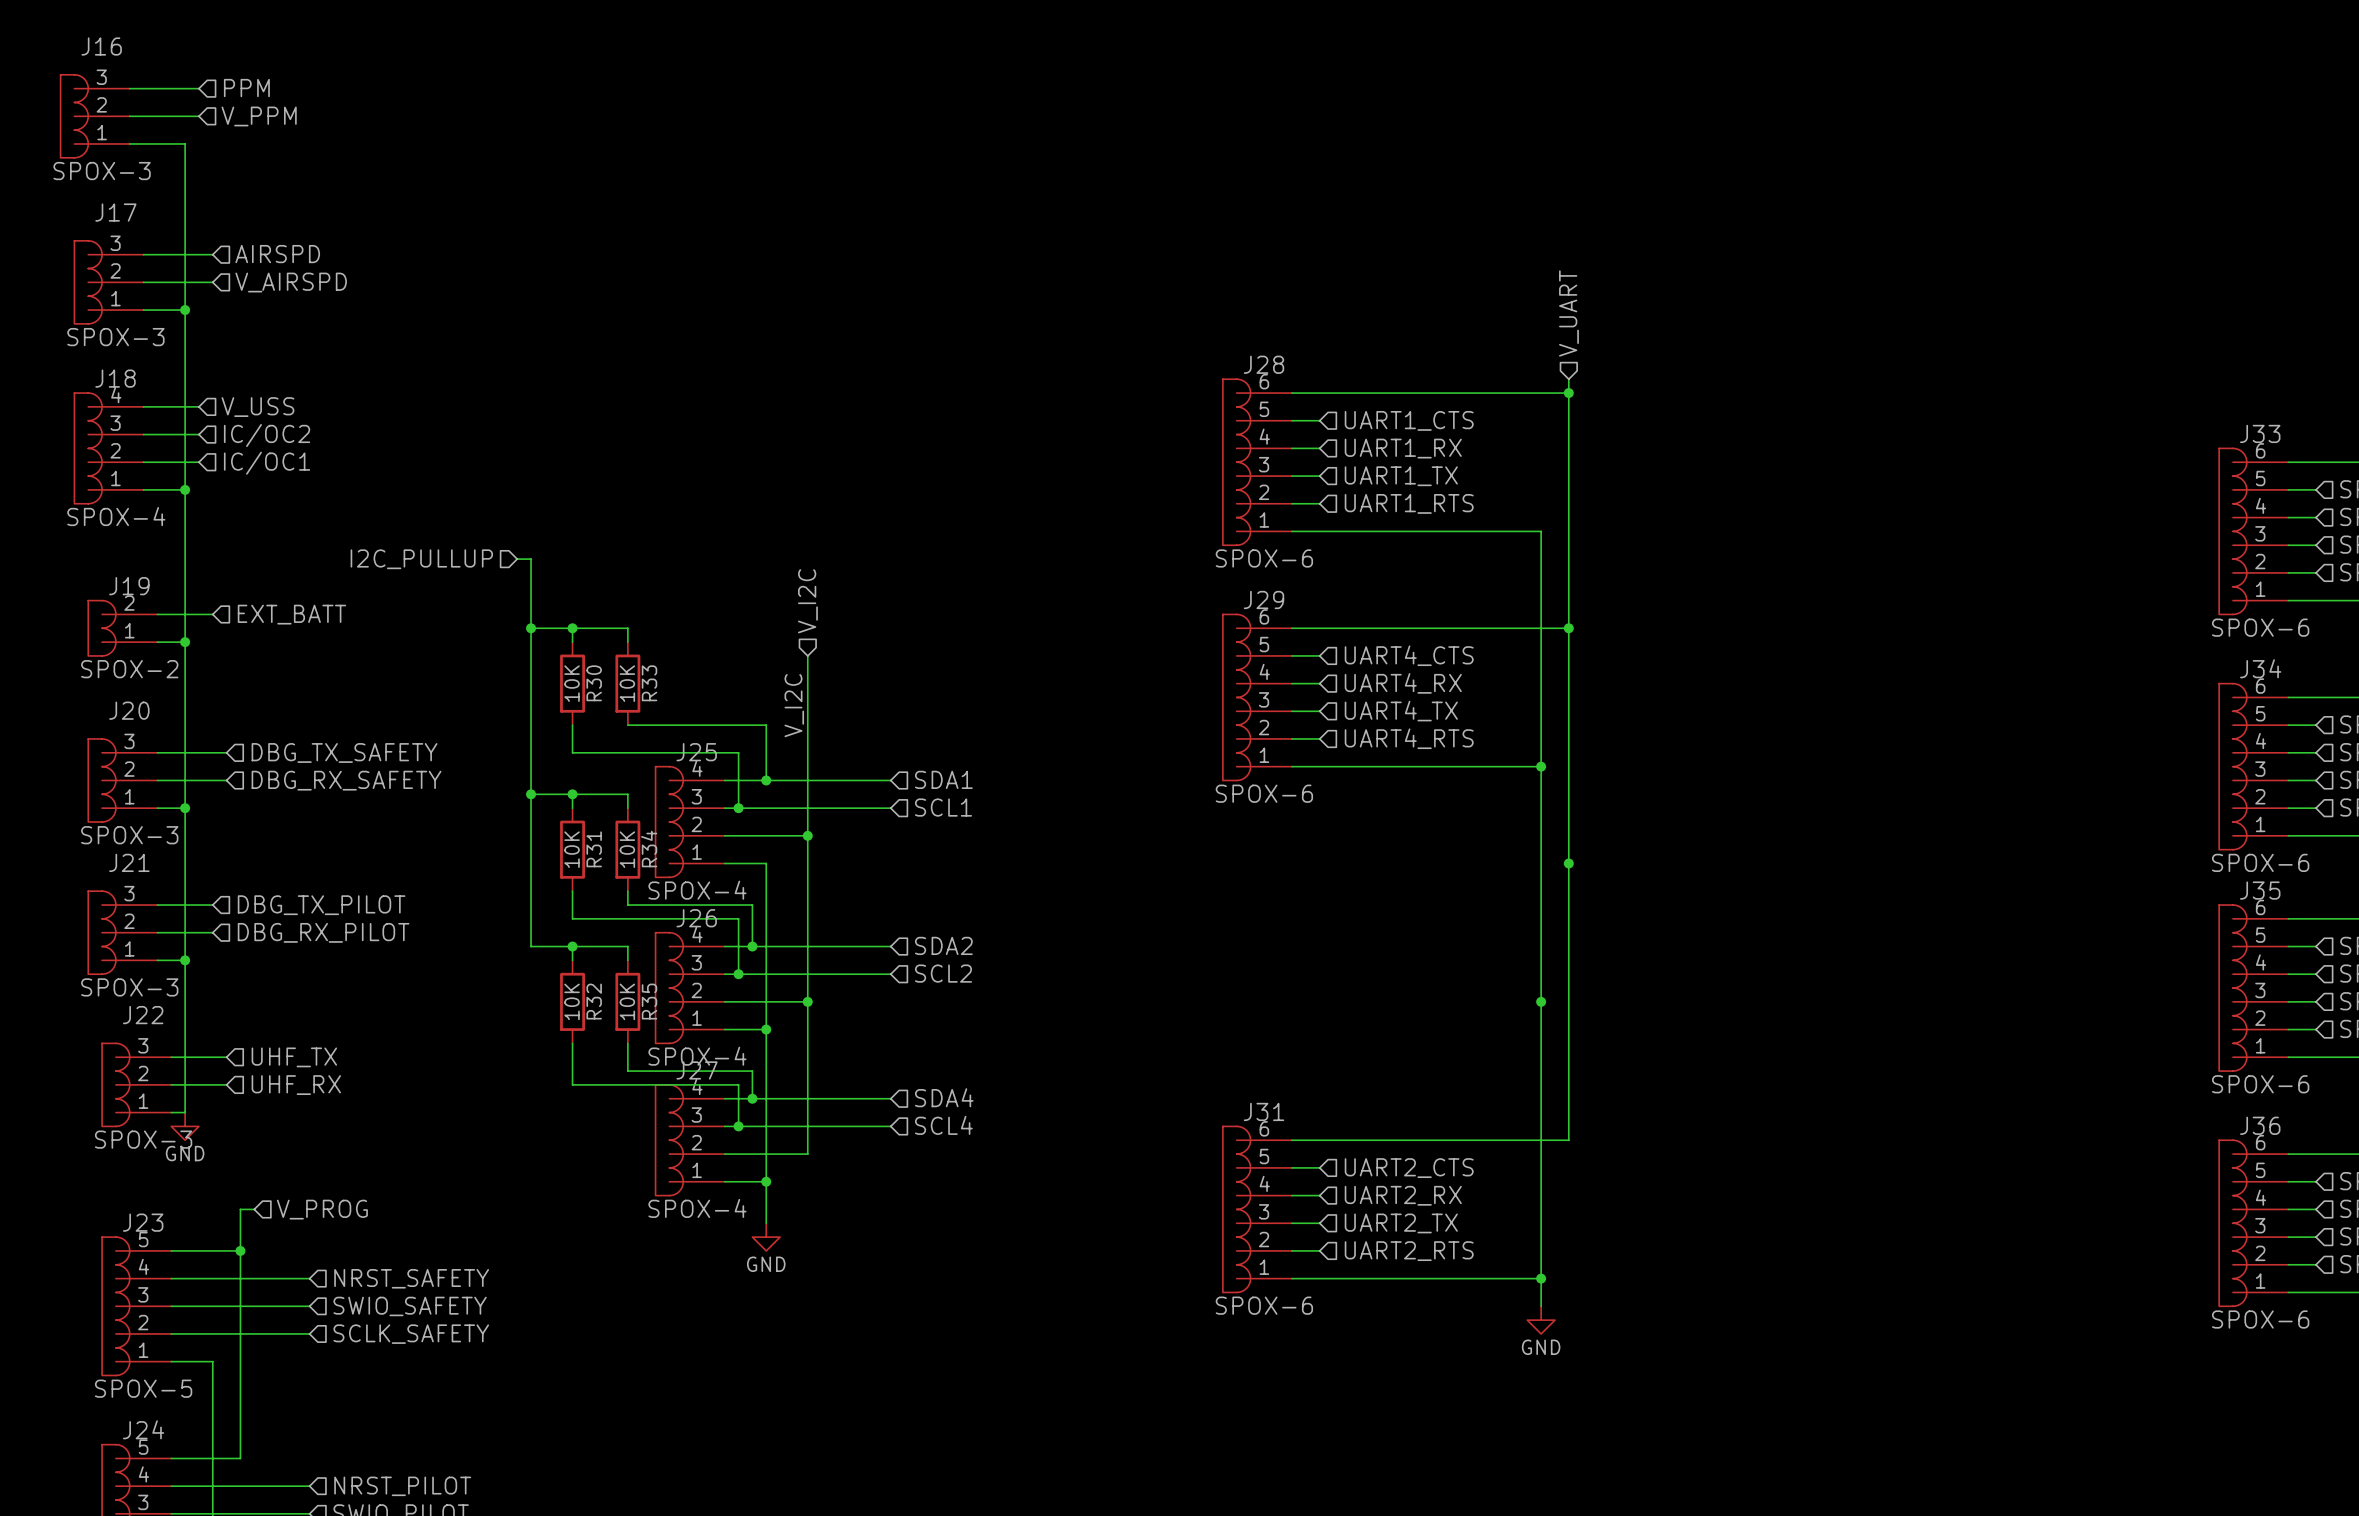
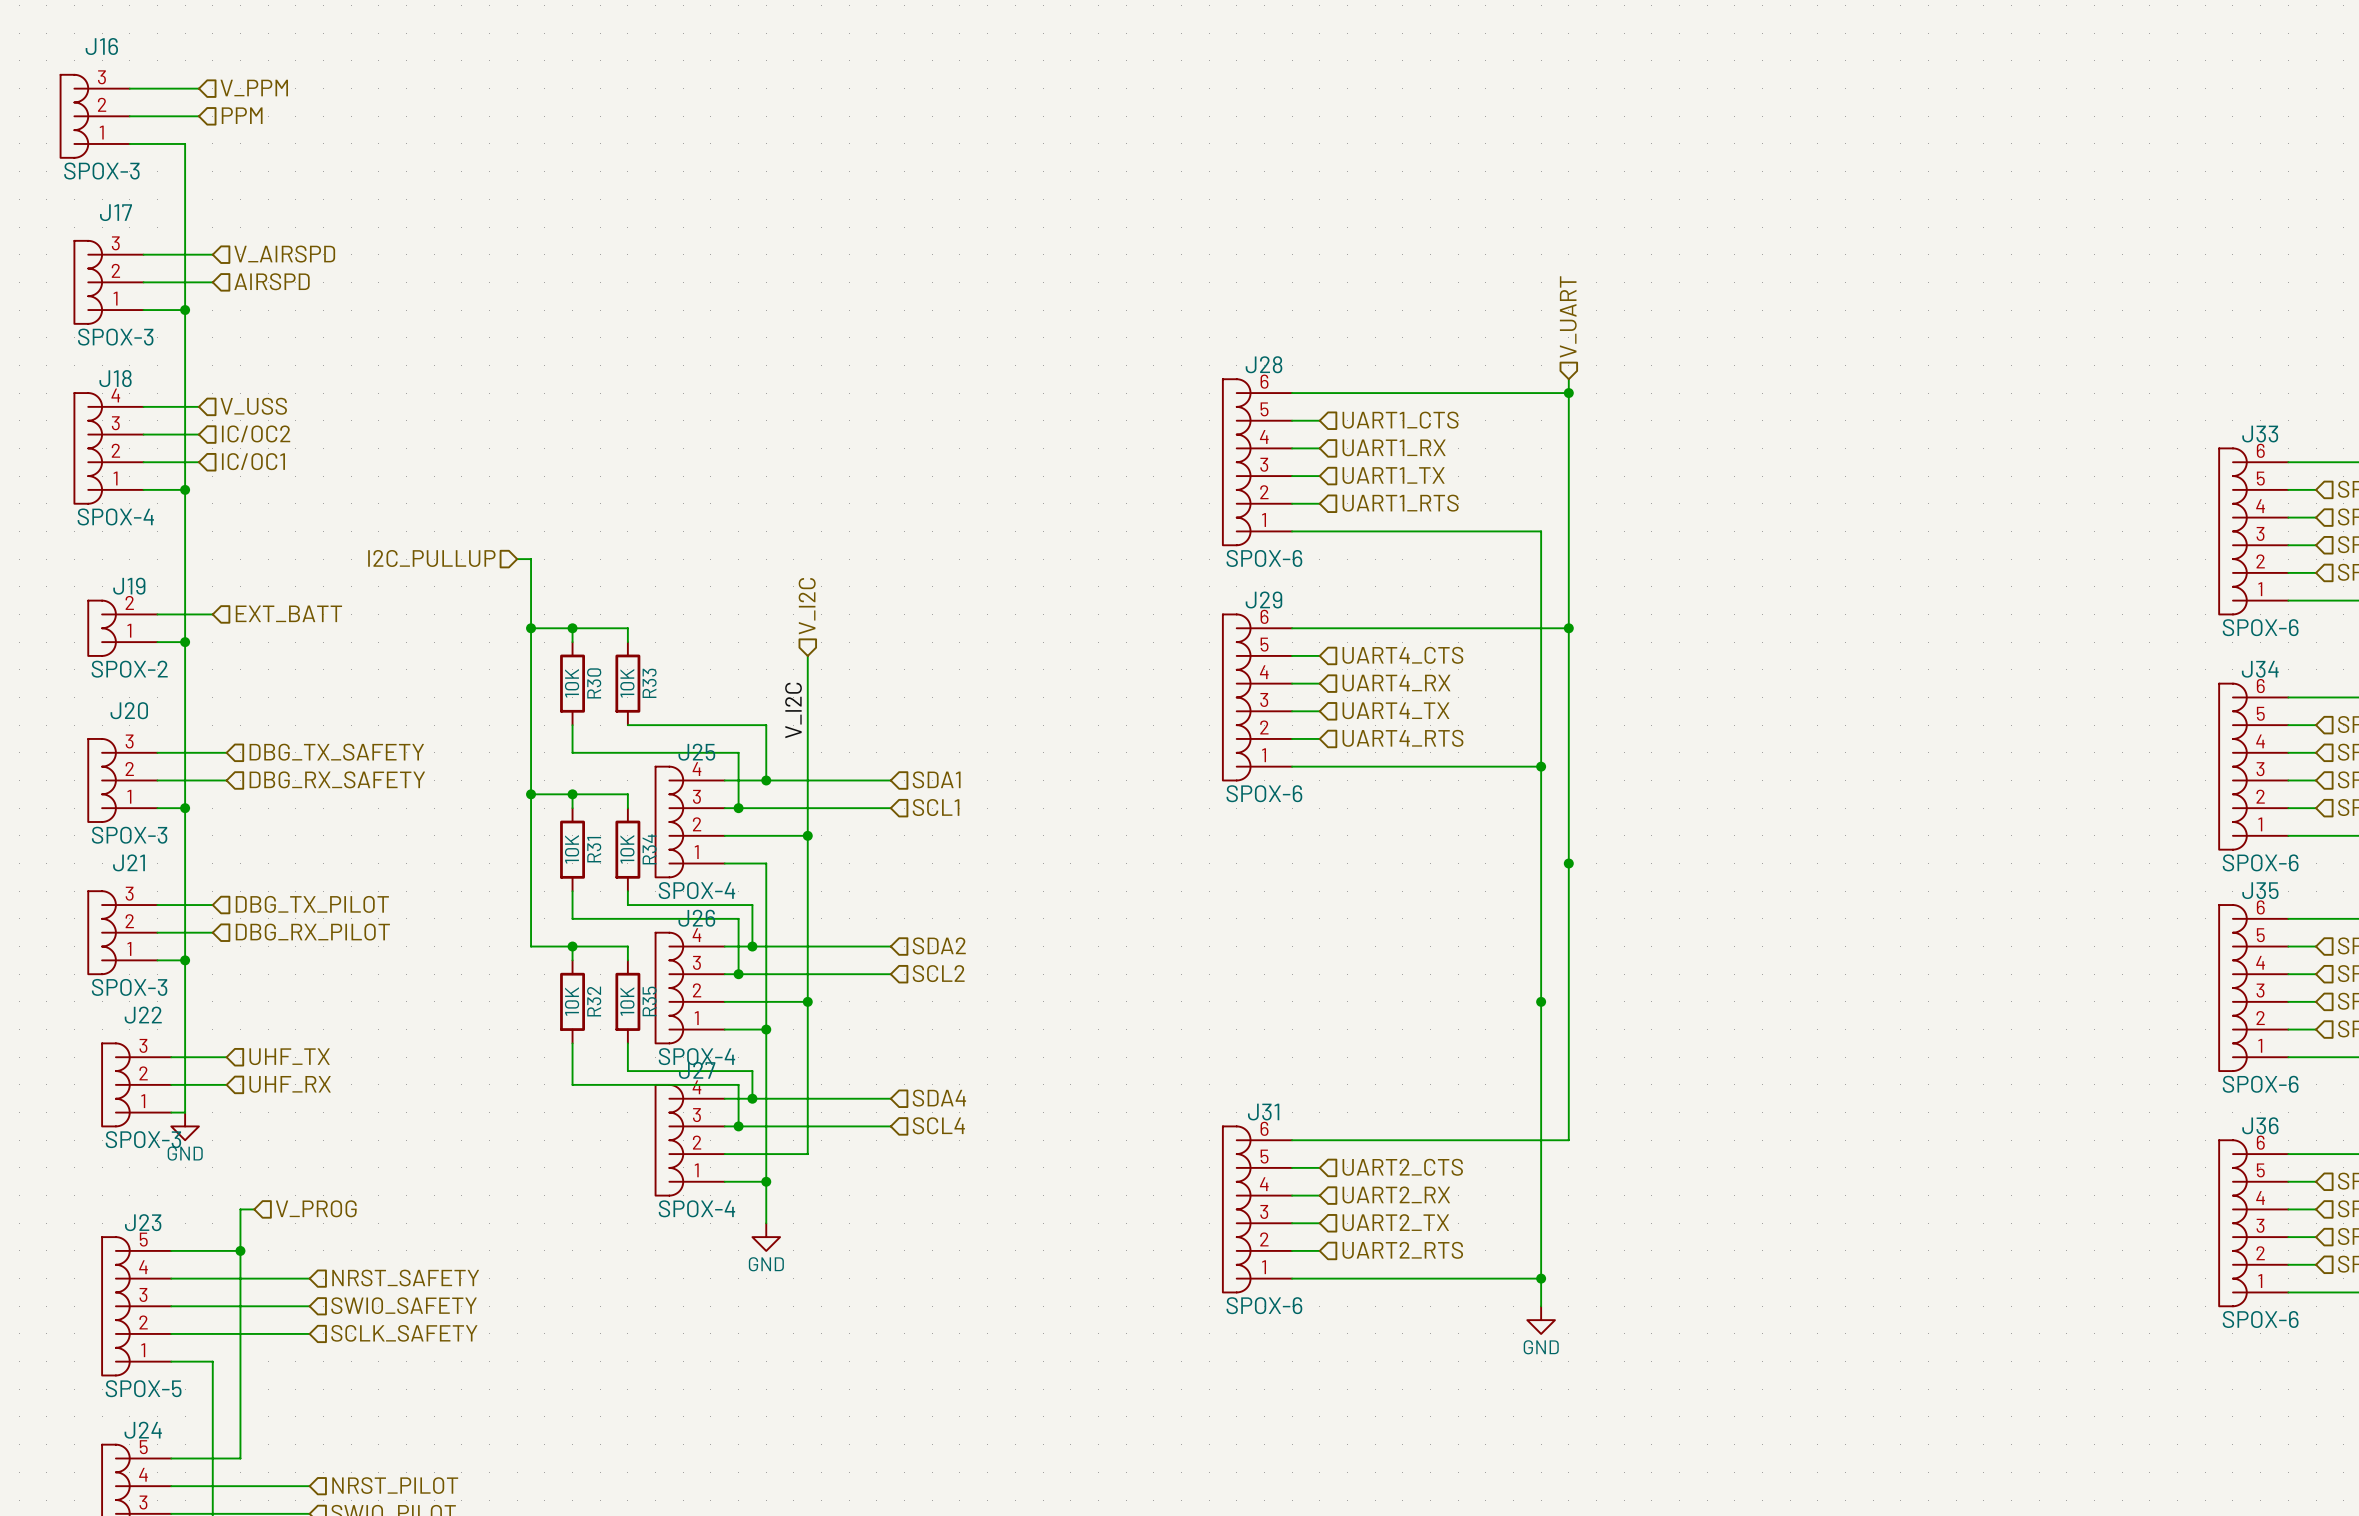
hierarchical label: PPM (246, 88) -> V_PPM (254, 88)
hierarchical label: V_PPM (259, 116) -> PPM (242, 115)
hierarchical label: AIRSPD (277, 254) -> V_AIRSPD (284, 254)
hierarchical label: V_AIRSPD (291, 282) -> AIRSPD (271, 281)

